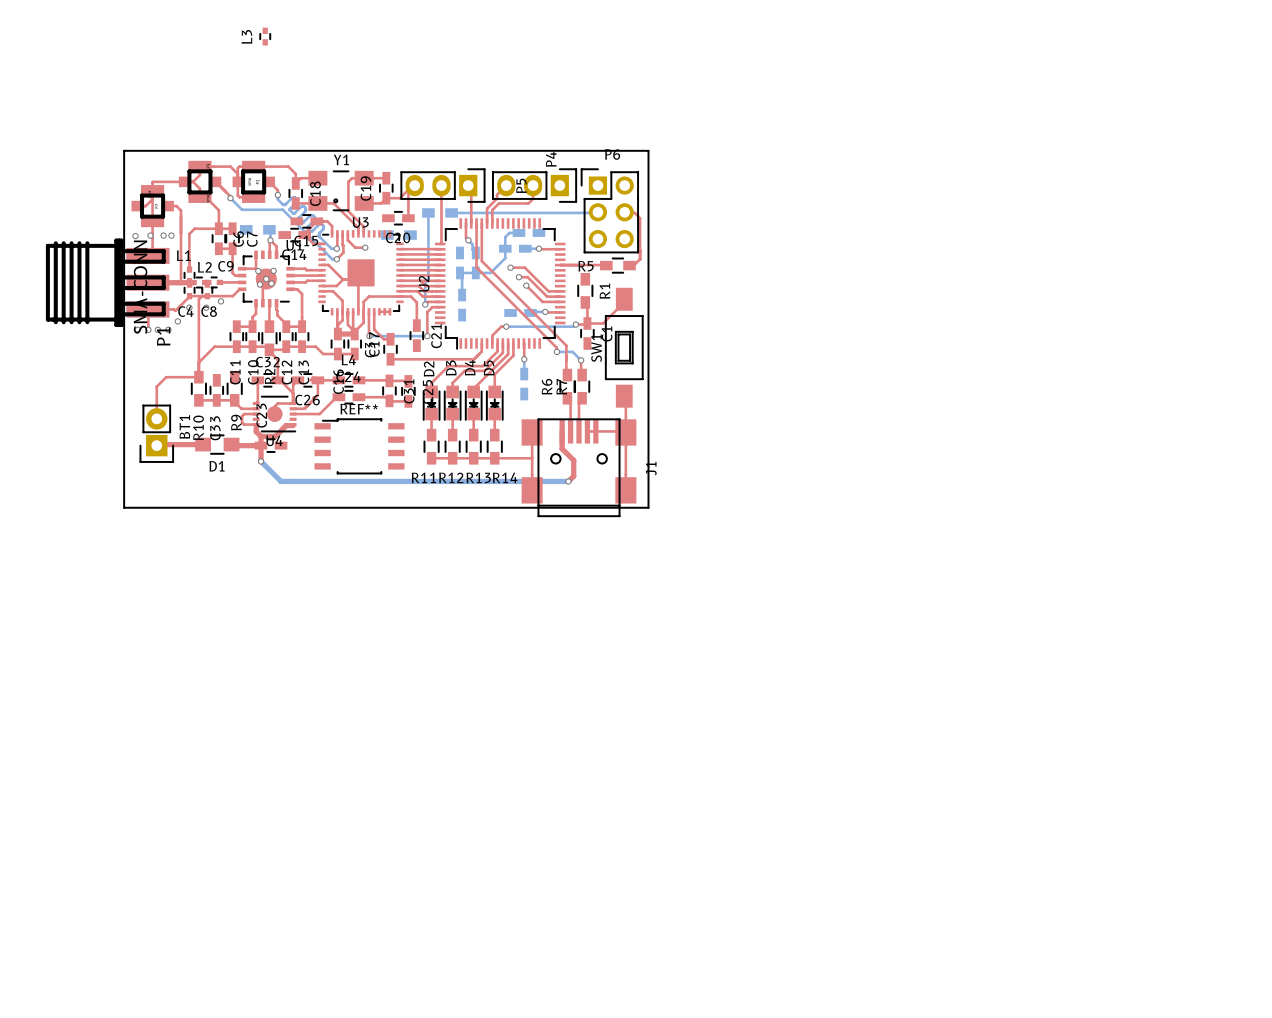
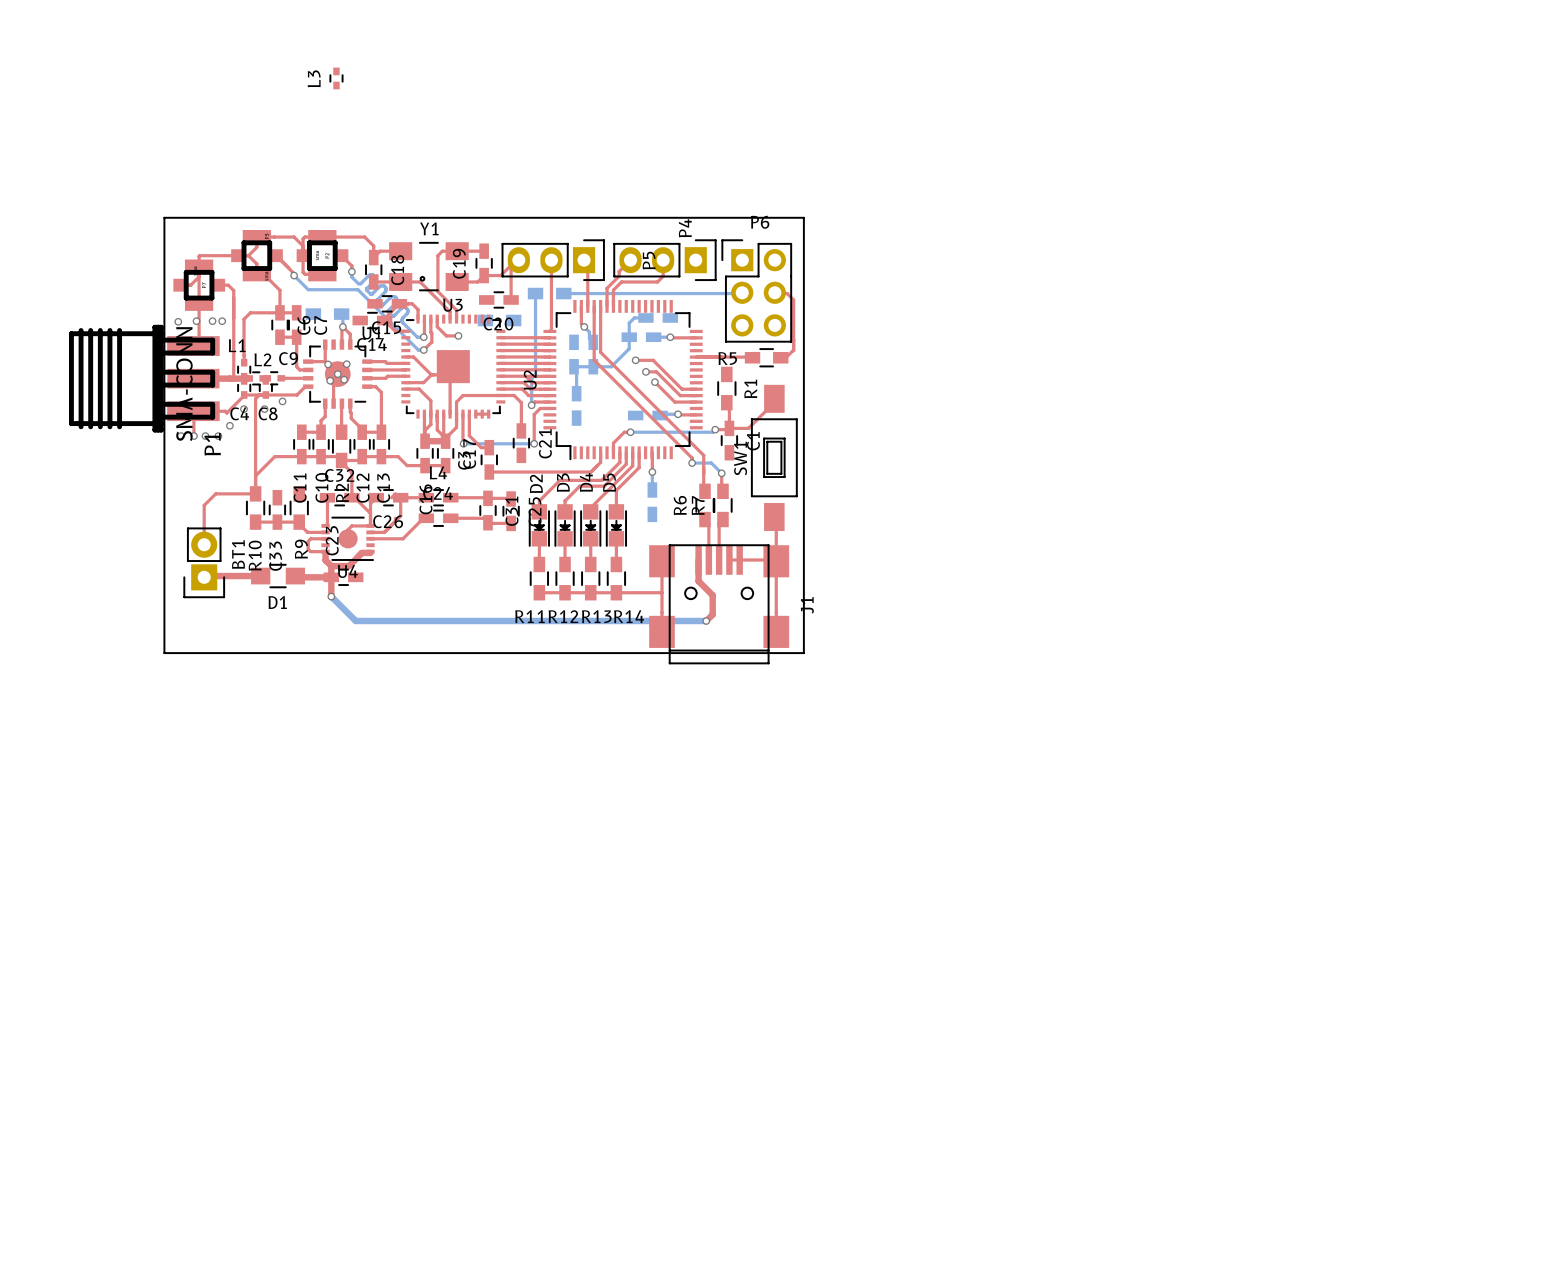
REF**: (359, 446) -> none

